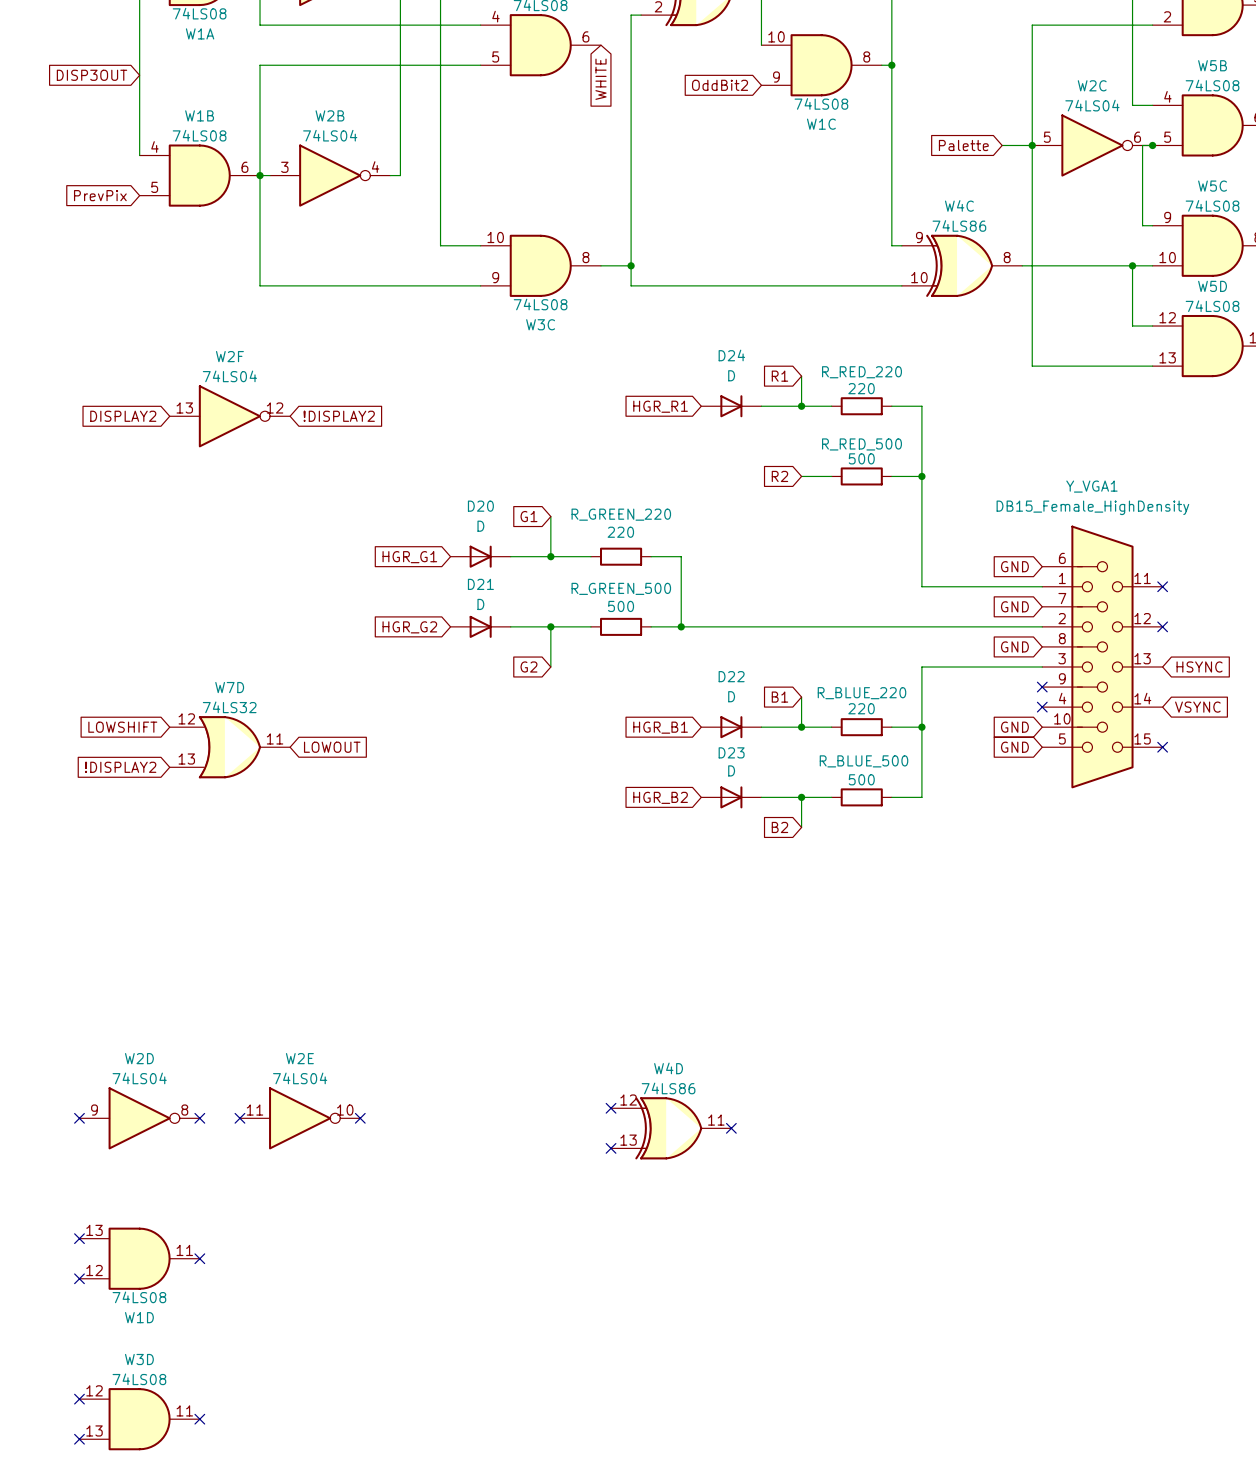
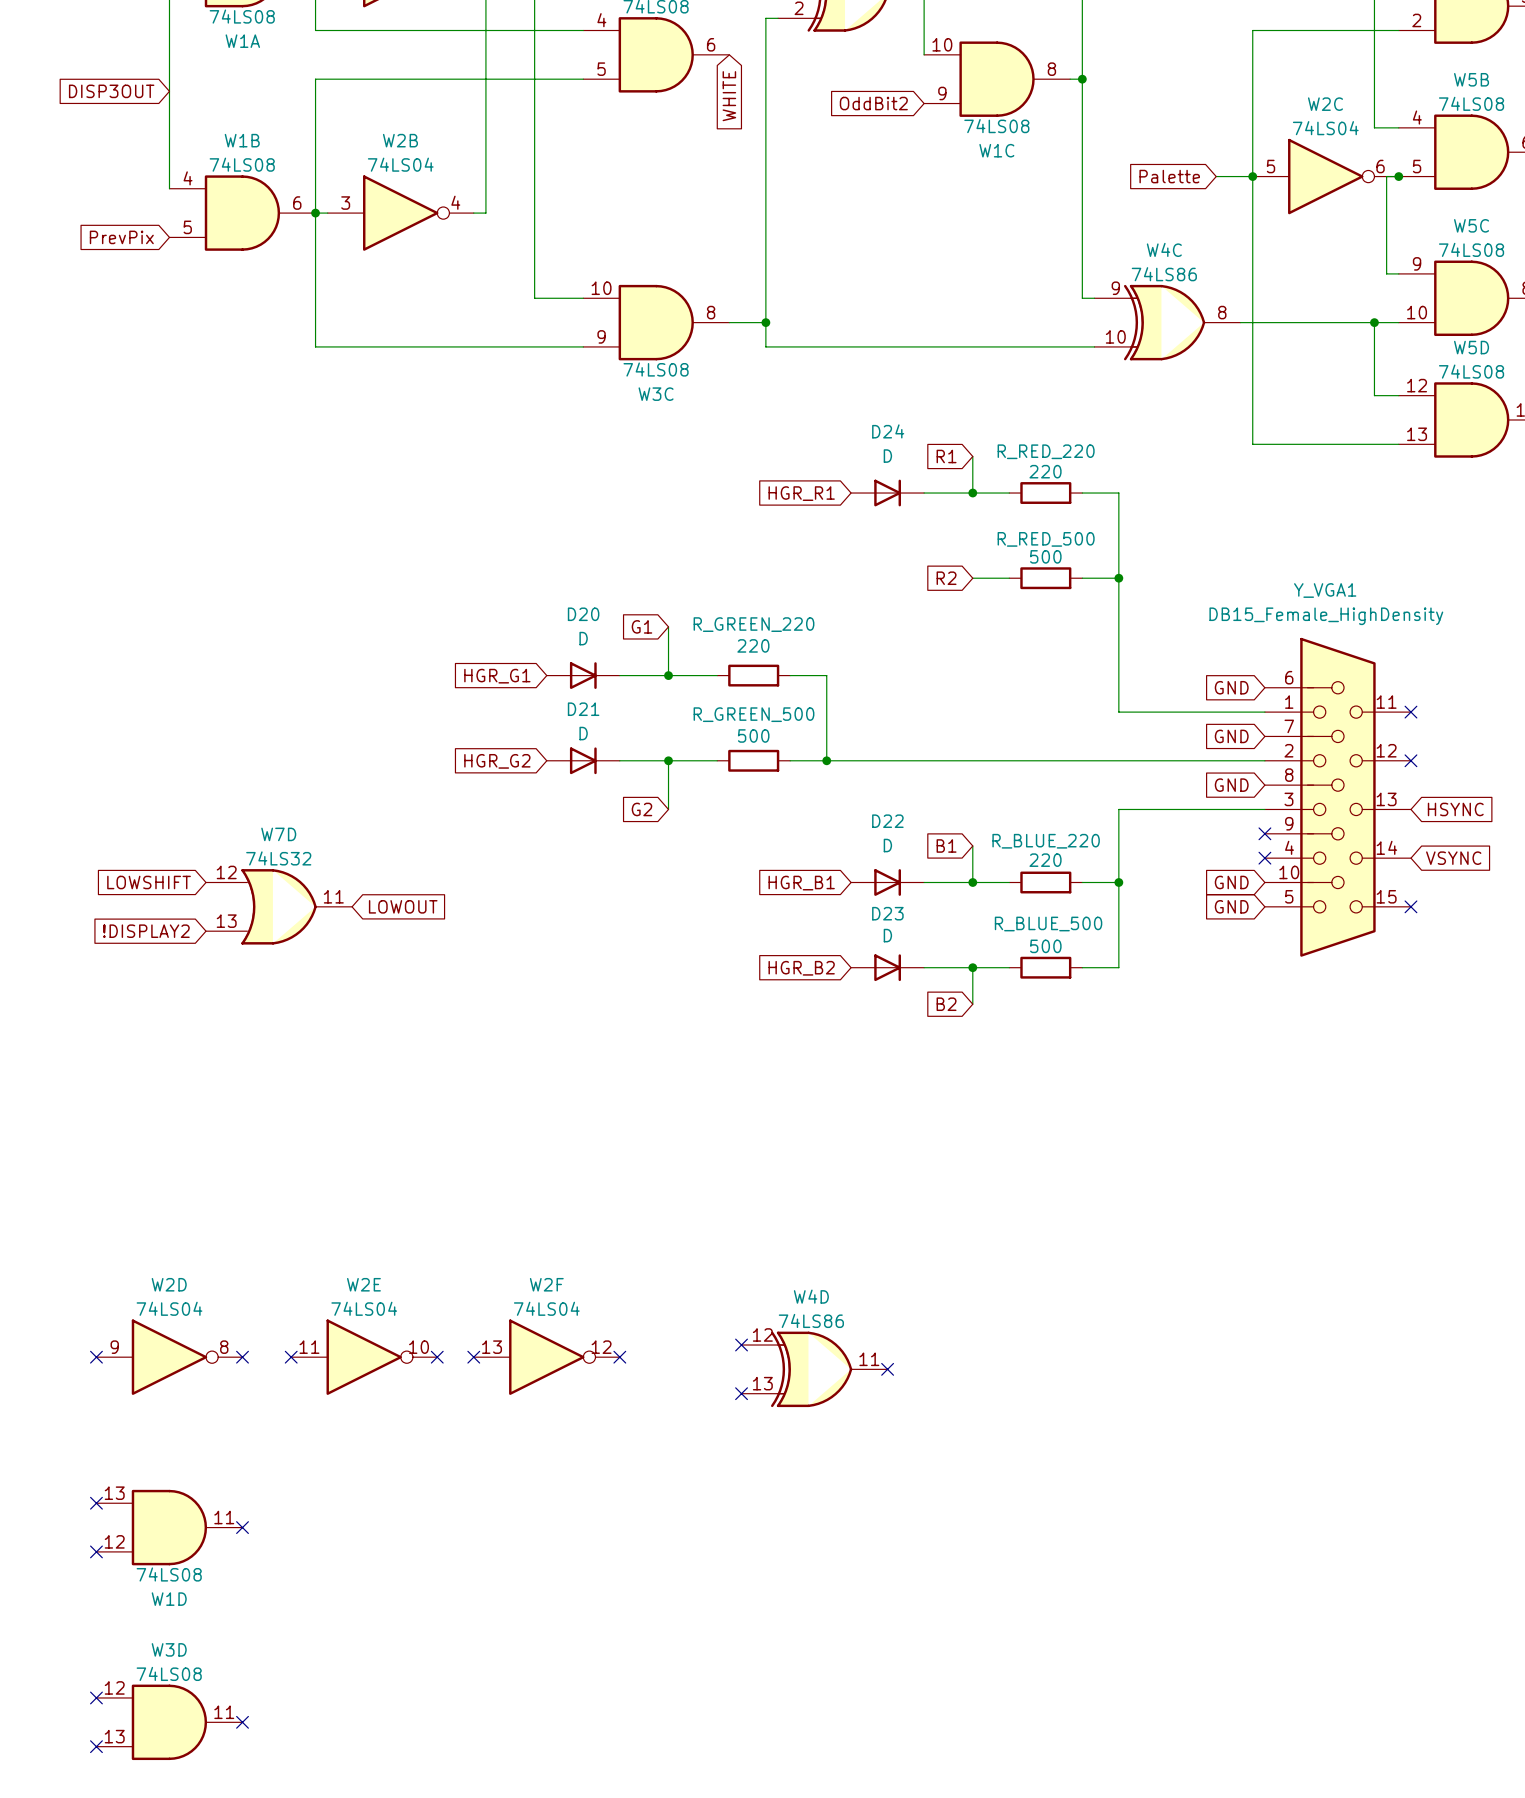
global label: DISPLAY2 (123, 416) -> none
W2F position: (229, 416) -> (546, 1357)
global label: !DISPLAY2 (339, 416) -> none
no-connect mark: none -> (473, 1357)
no-connect mark: none -> (619, 1357)

